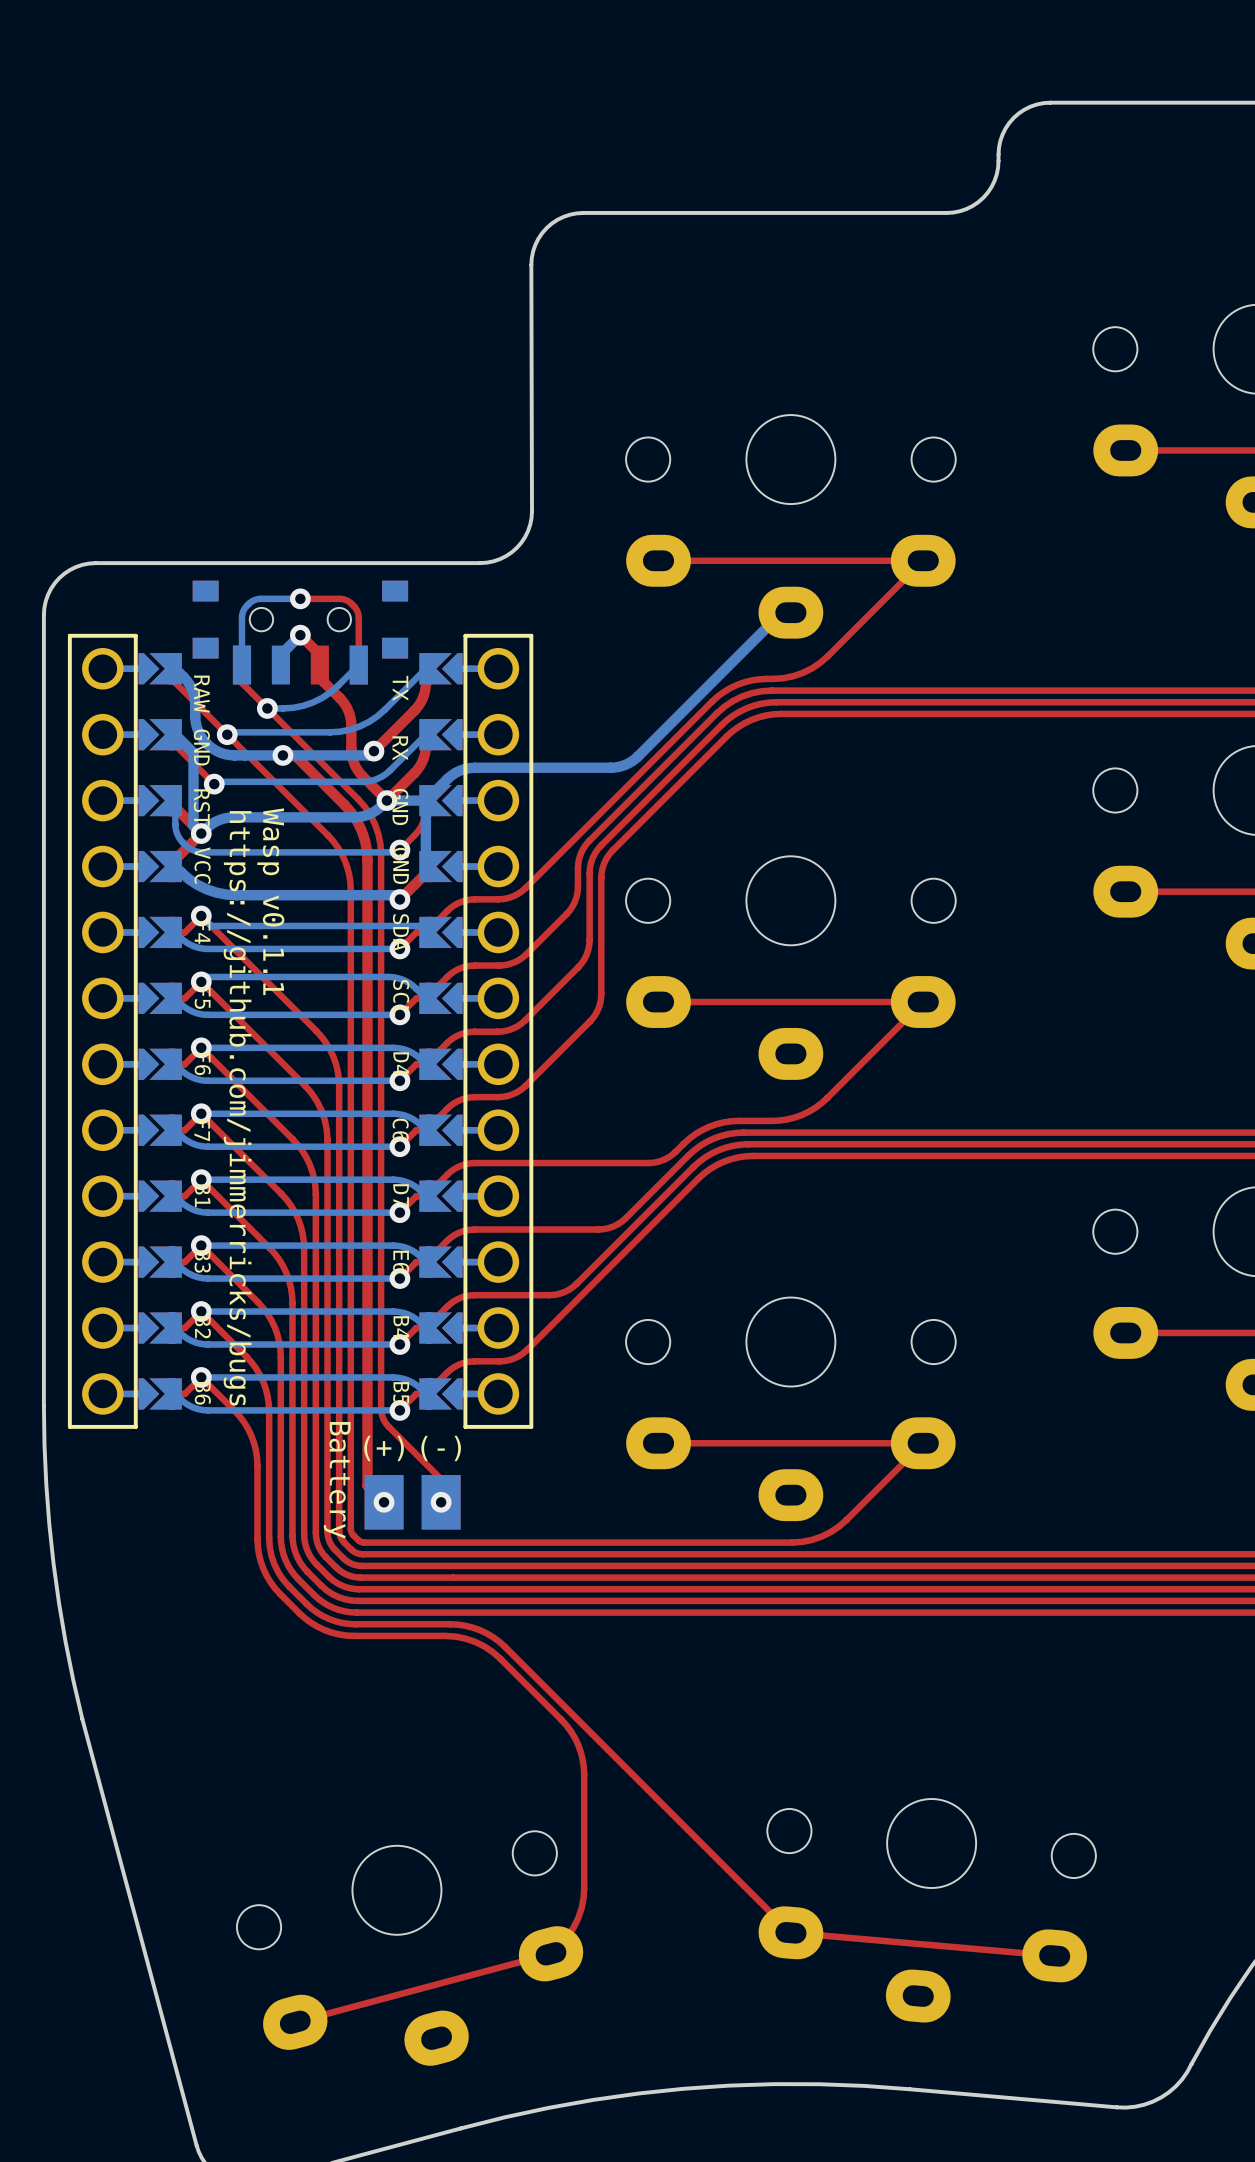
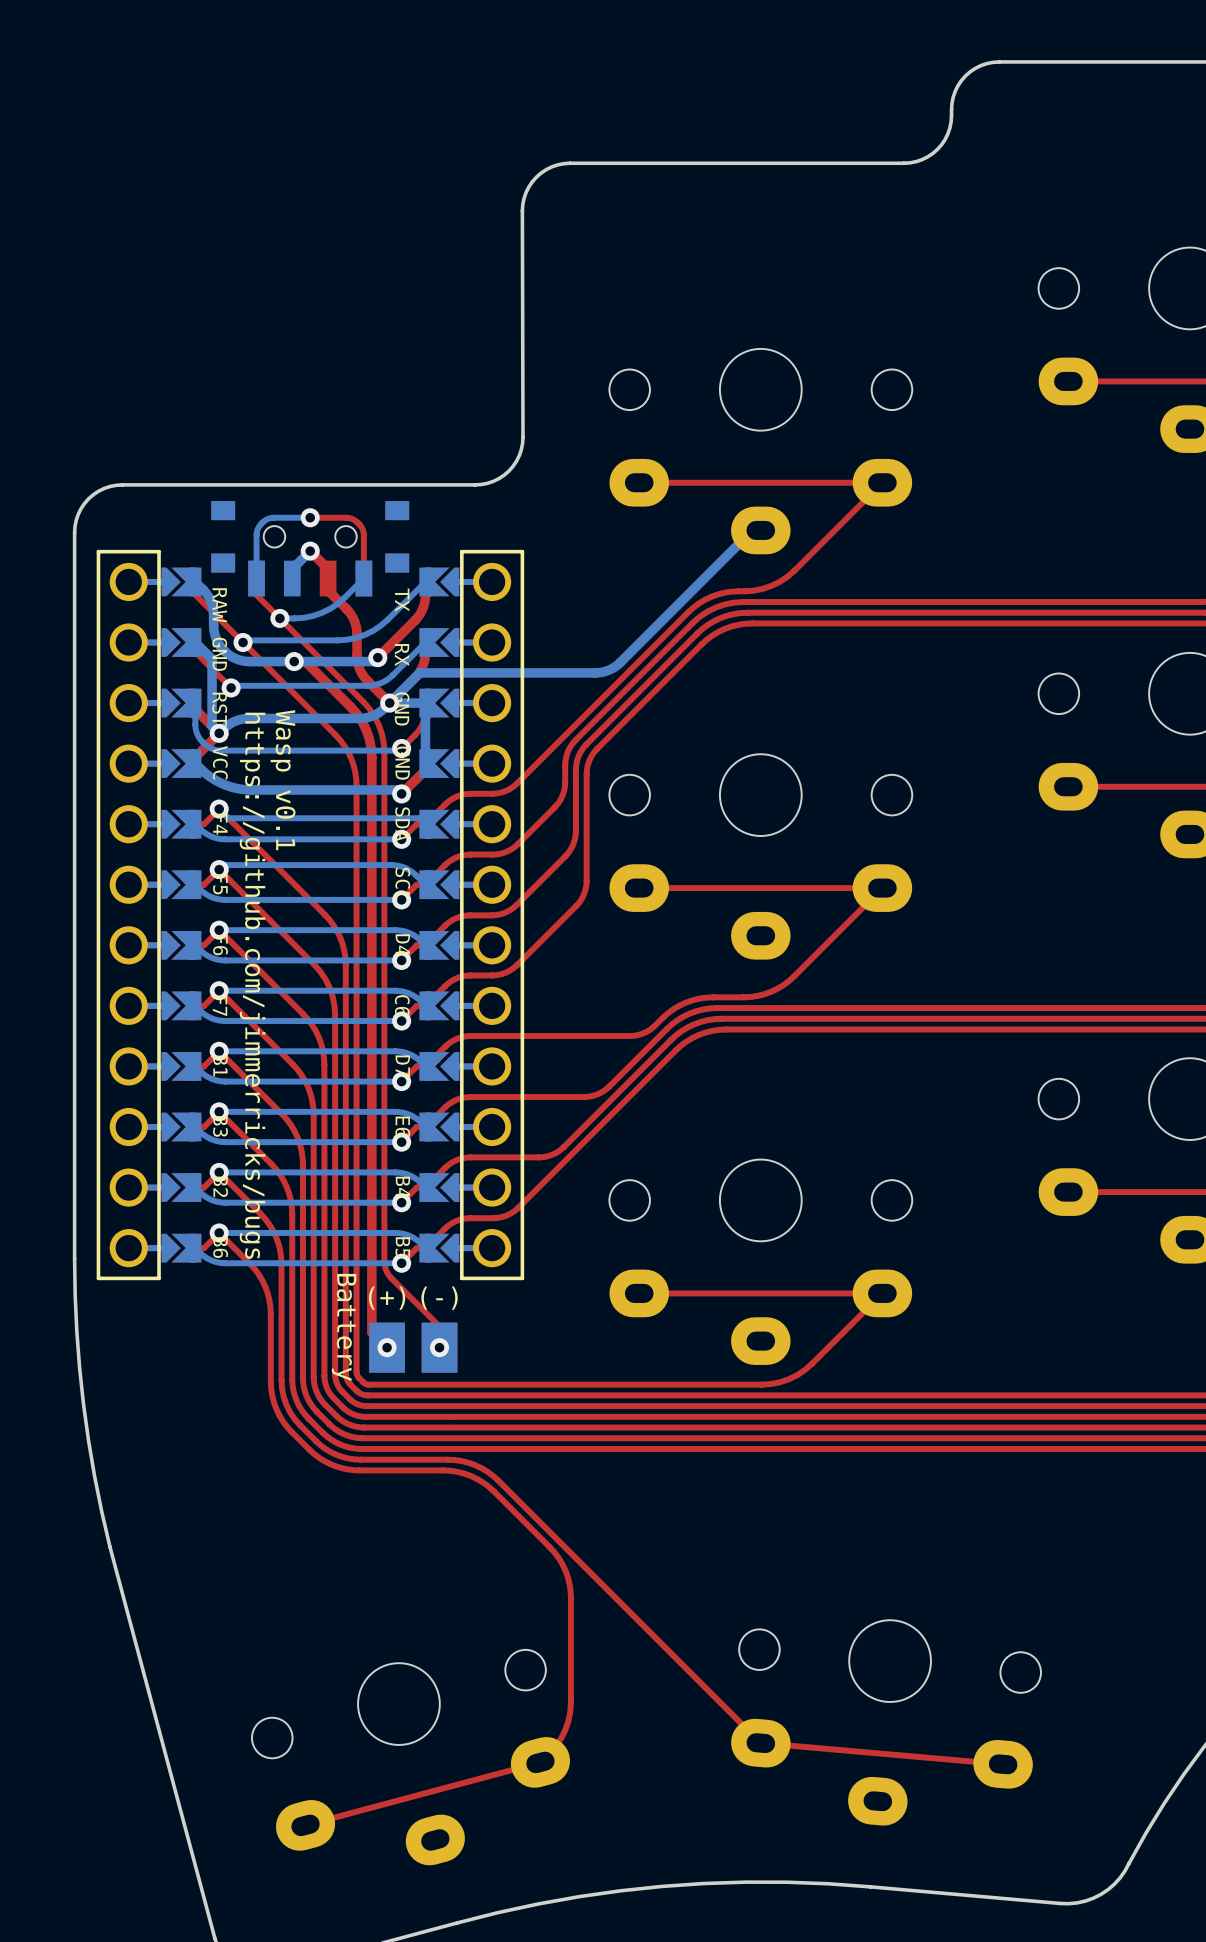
bottom track: (474, 767) (459, 770) (451, 775) (425, 800) -> (470, 672) (419, 672) (389, 703)
text: Wasp v0.1.1 (270, 901) -> Wasp v0.1 (283, 780)

